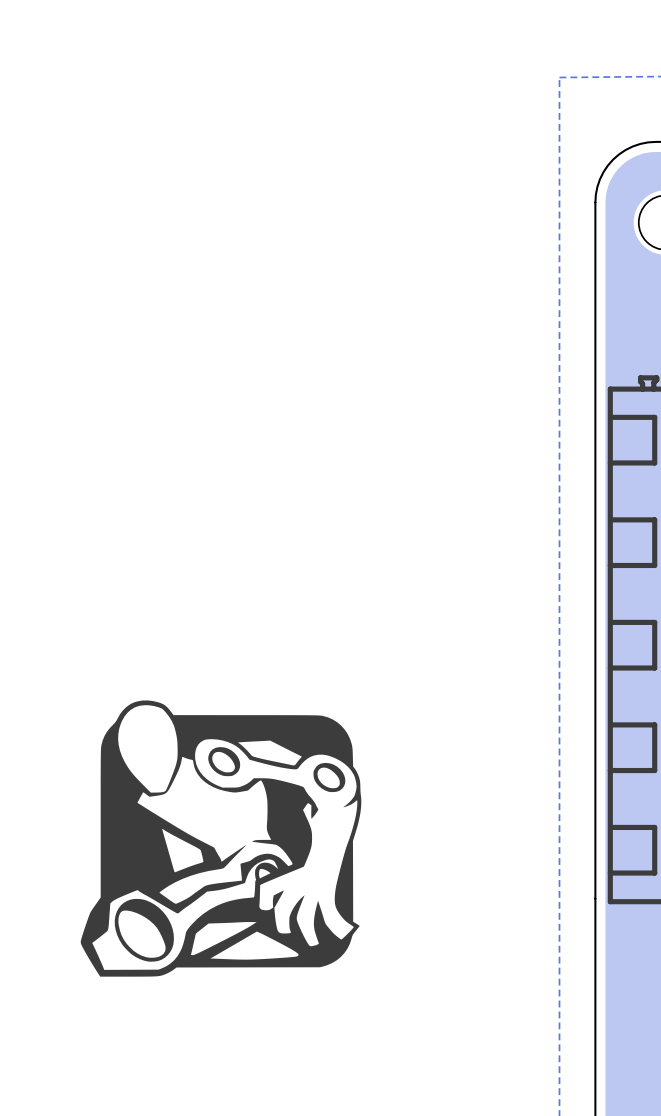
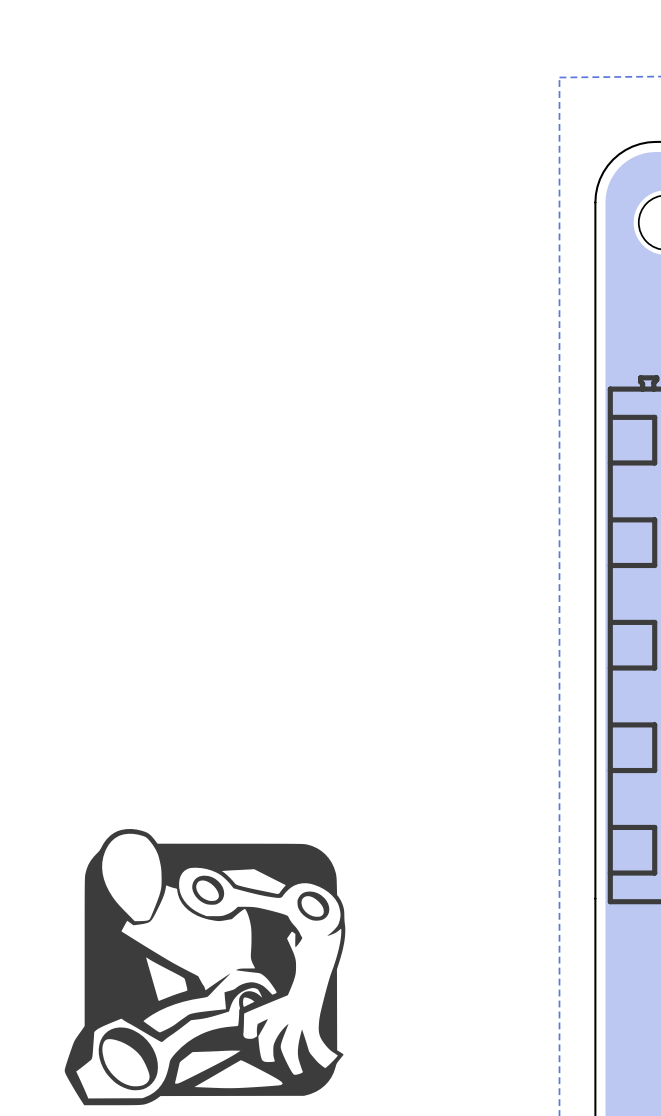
drawing position: (221, 838) -> (205, 967)

